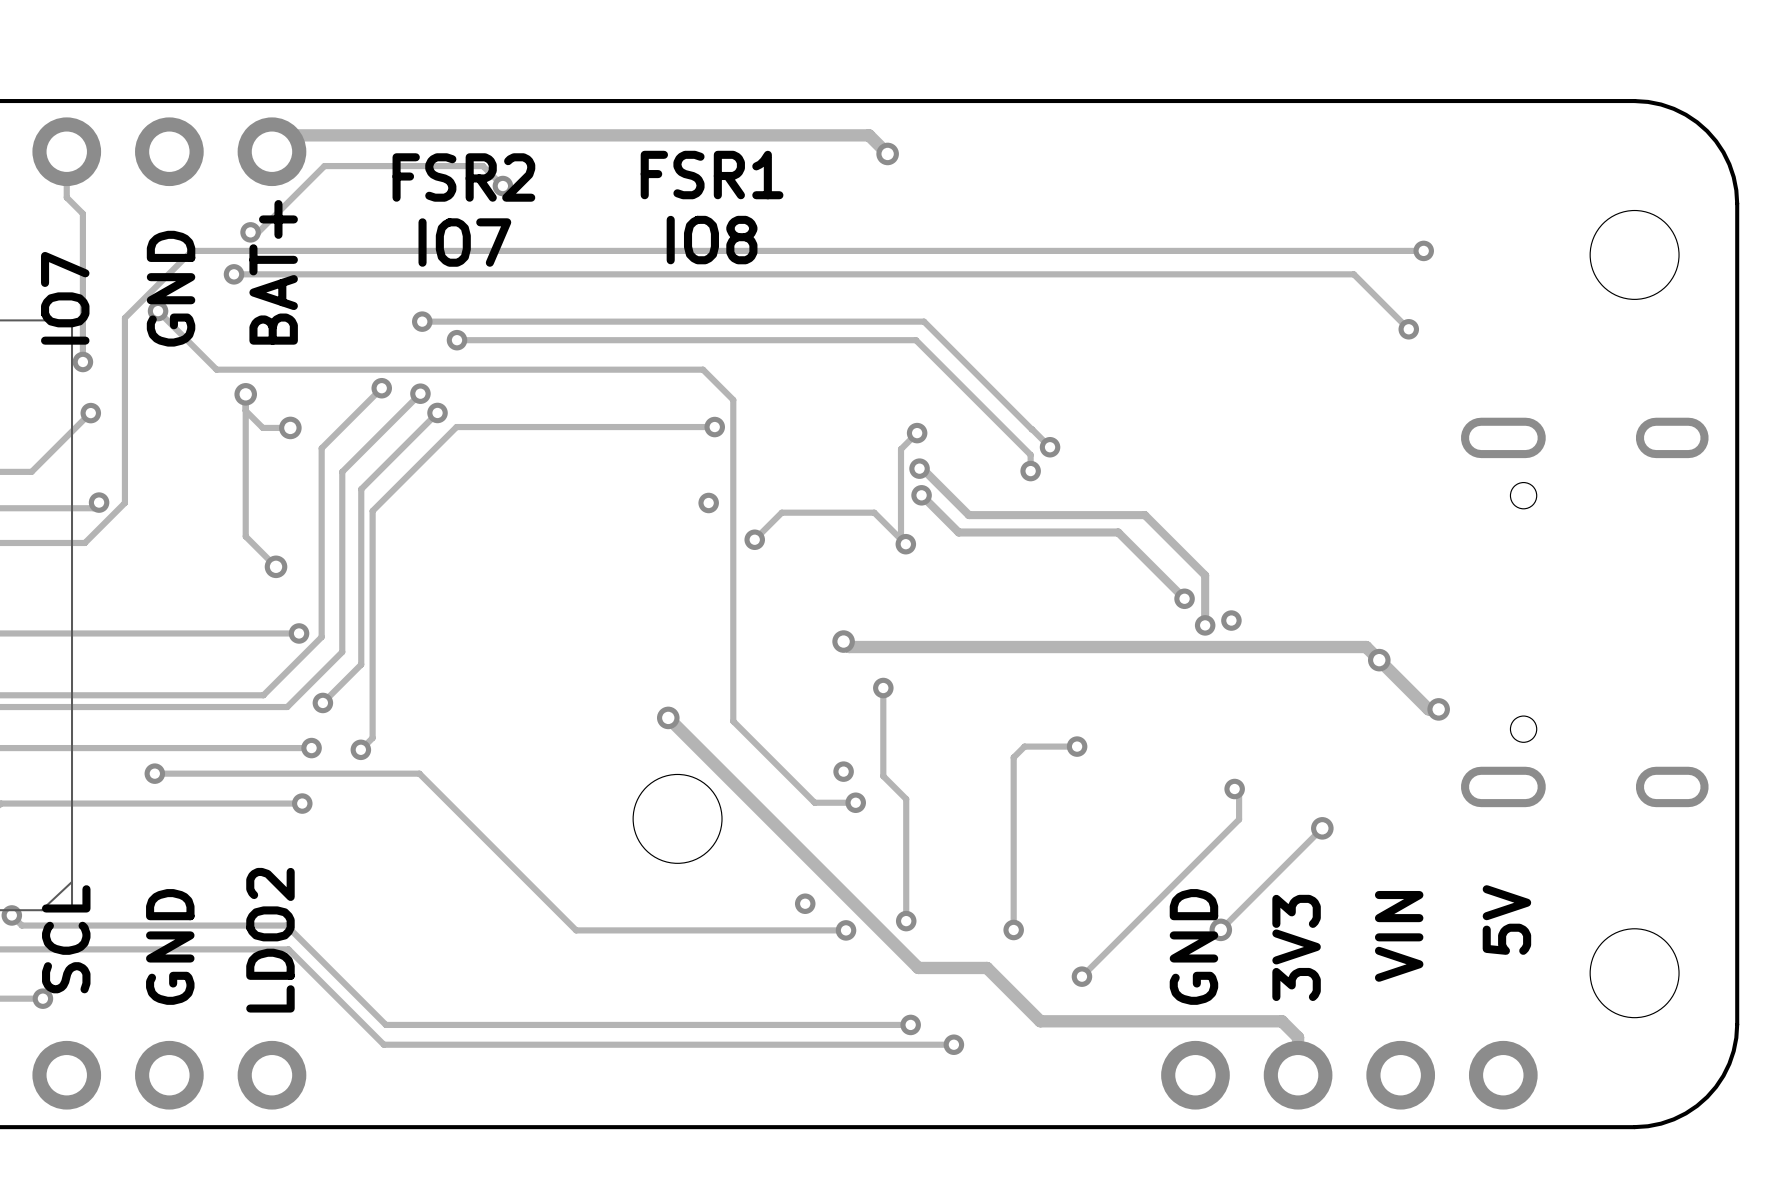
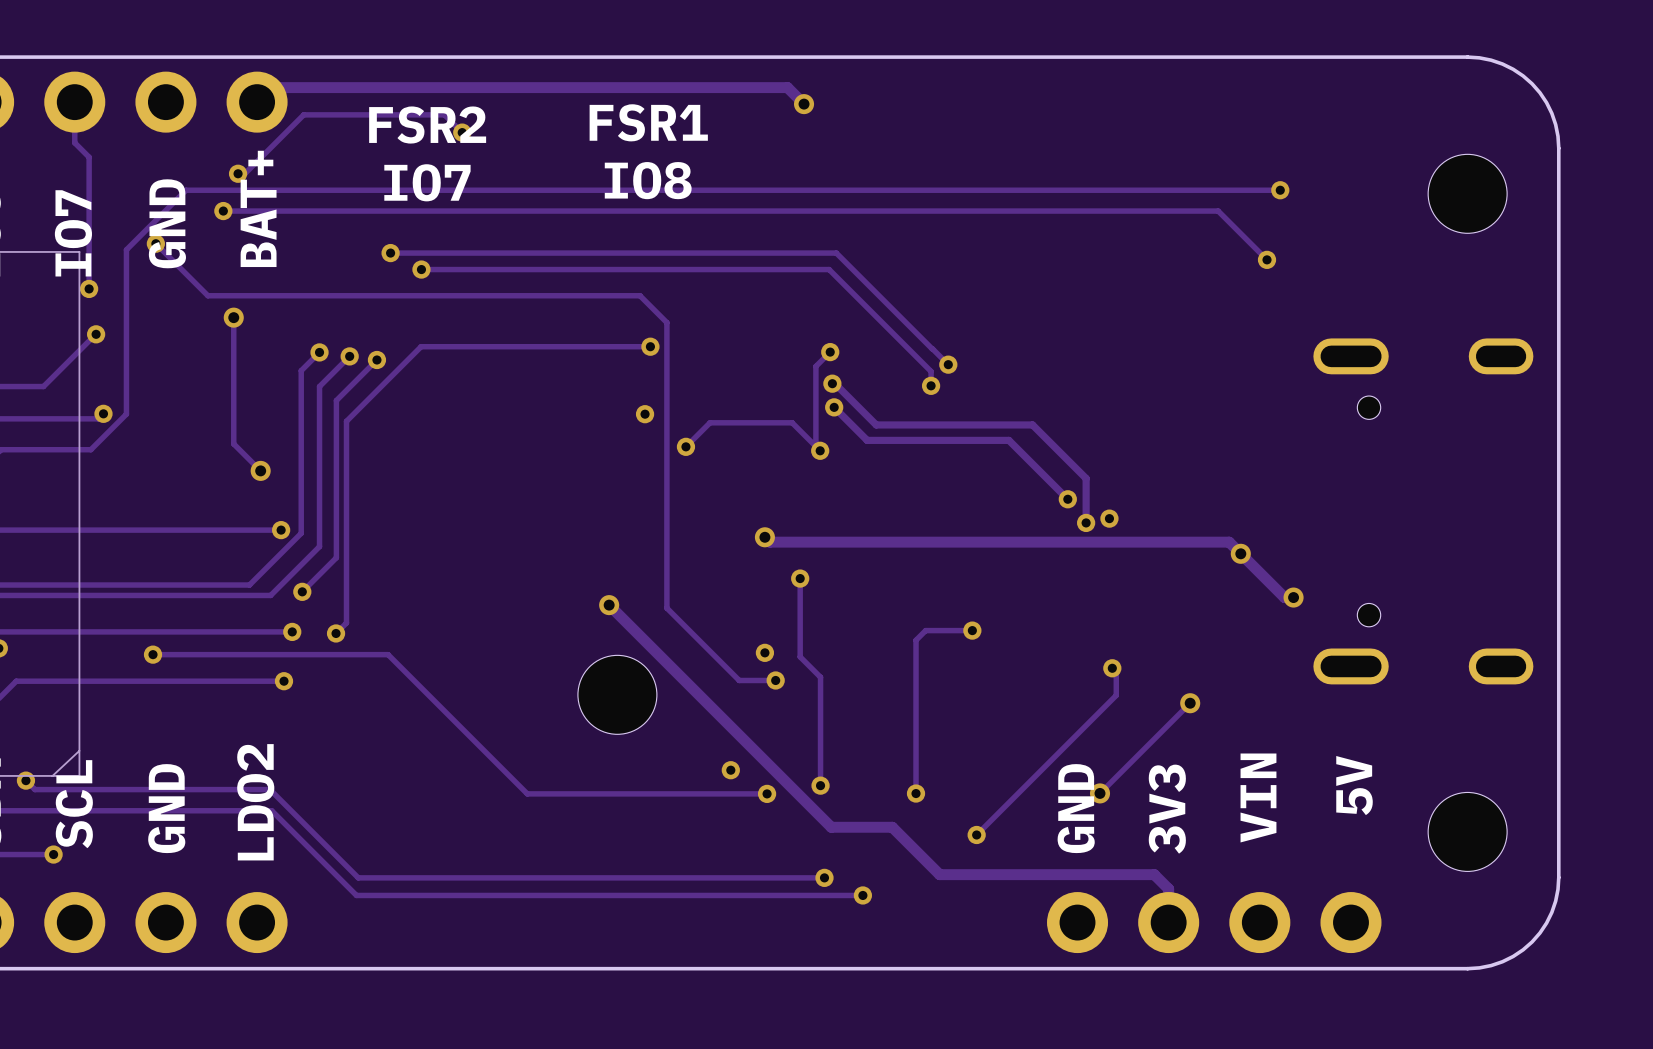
track: (381, 388) (321, 448) (321, 454) -> (319, 352) (301, 370)
via: (381, 388) -> none
track: (420, 393) (376, 437) -> none
via: (420, 393) -> none
track: (245, 410) (262, 427) (290, 427) -> none
track: (437, 412) (361, 489) -> (376, 359) (336, 401)
via: (437, 412) -> none
via: (290, 427) -> none
via: none -> (319, 352)
via: none -> (349, 356)
via: none -> (376, 359)

